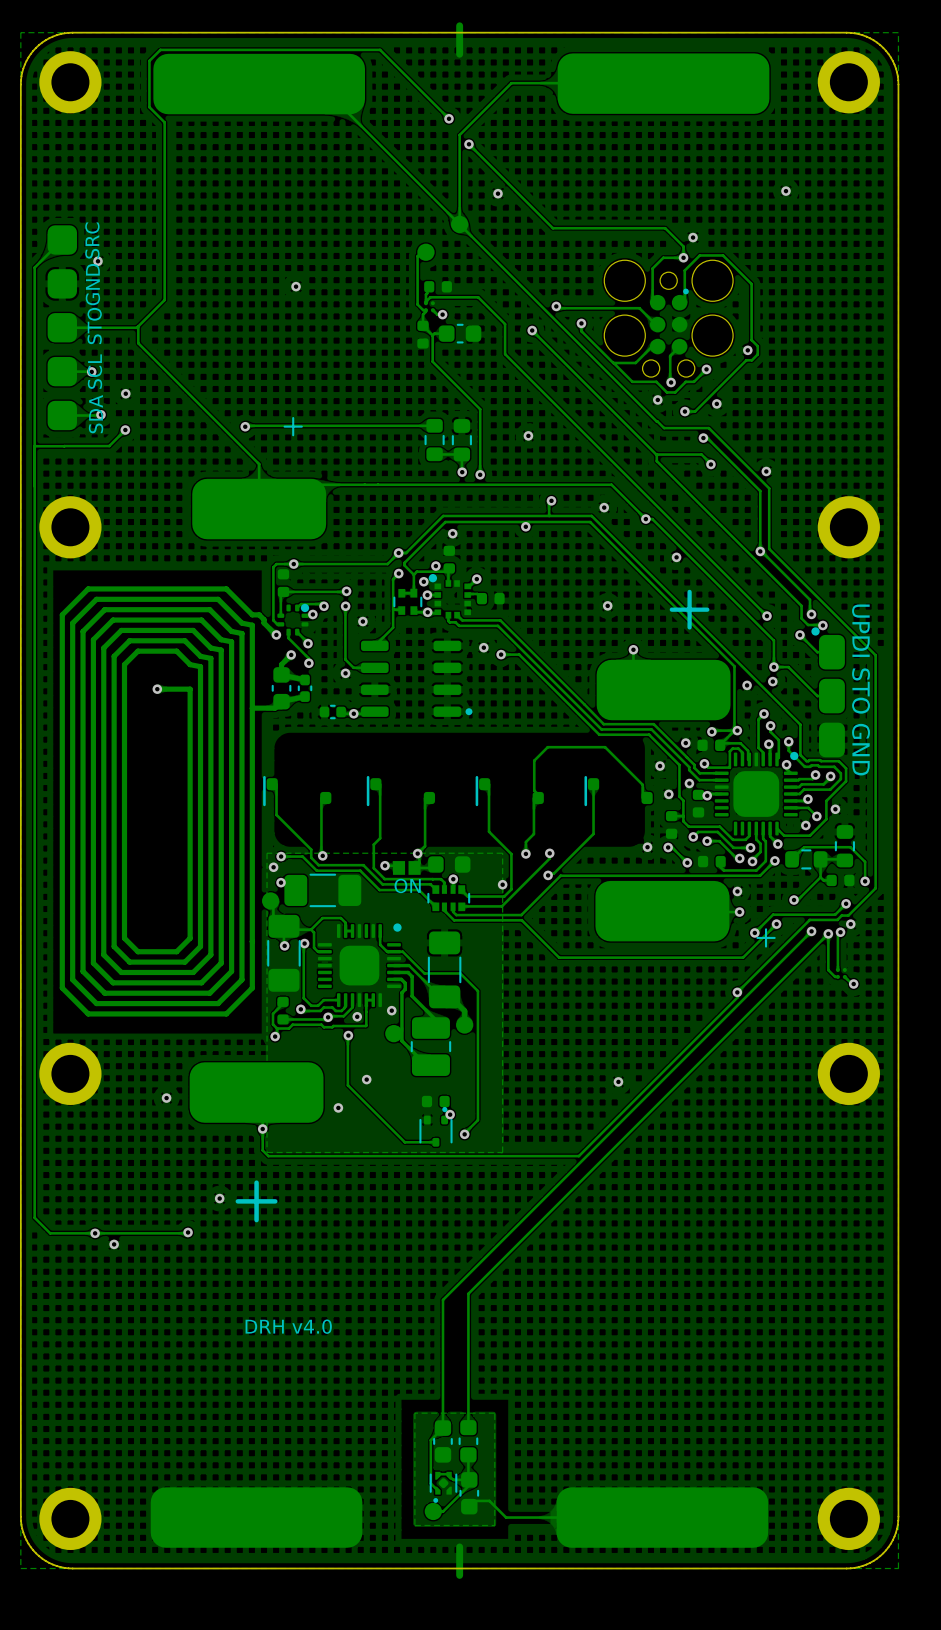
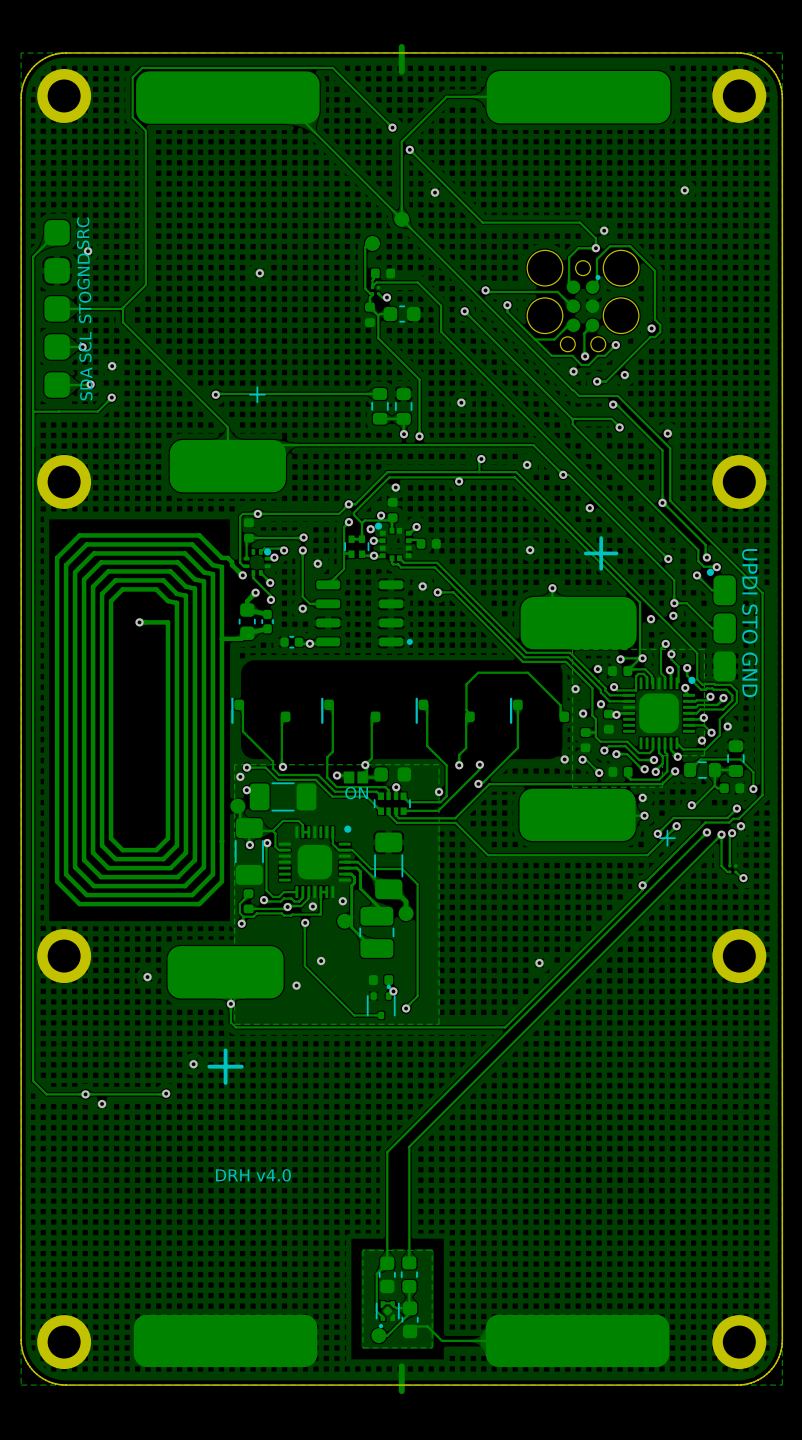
zone outline: none -> (704, 649) (572, 649) (572, 787) (662, 787) (662, 755) (704, 755) (704, 649)

